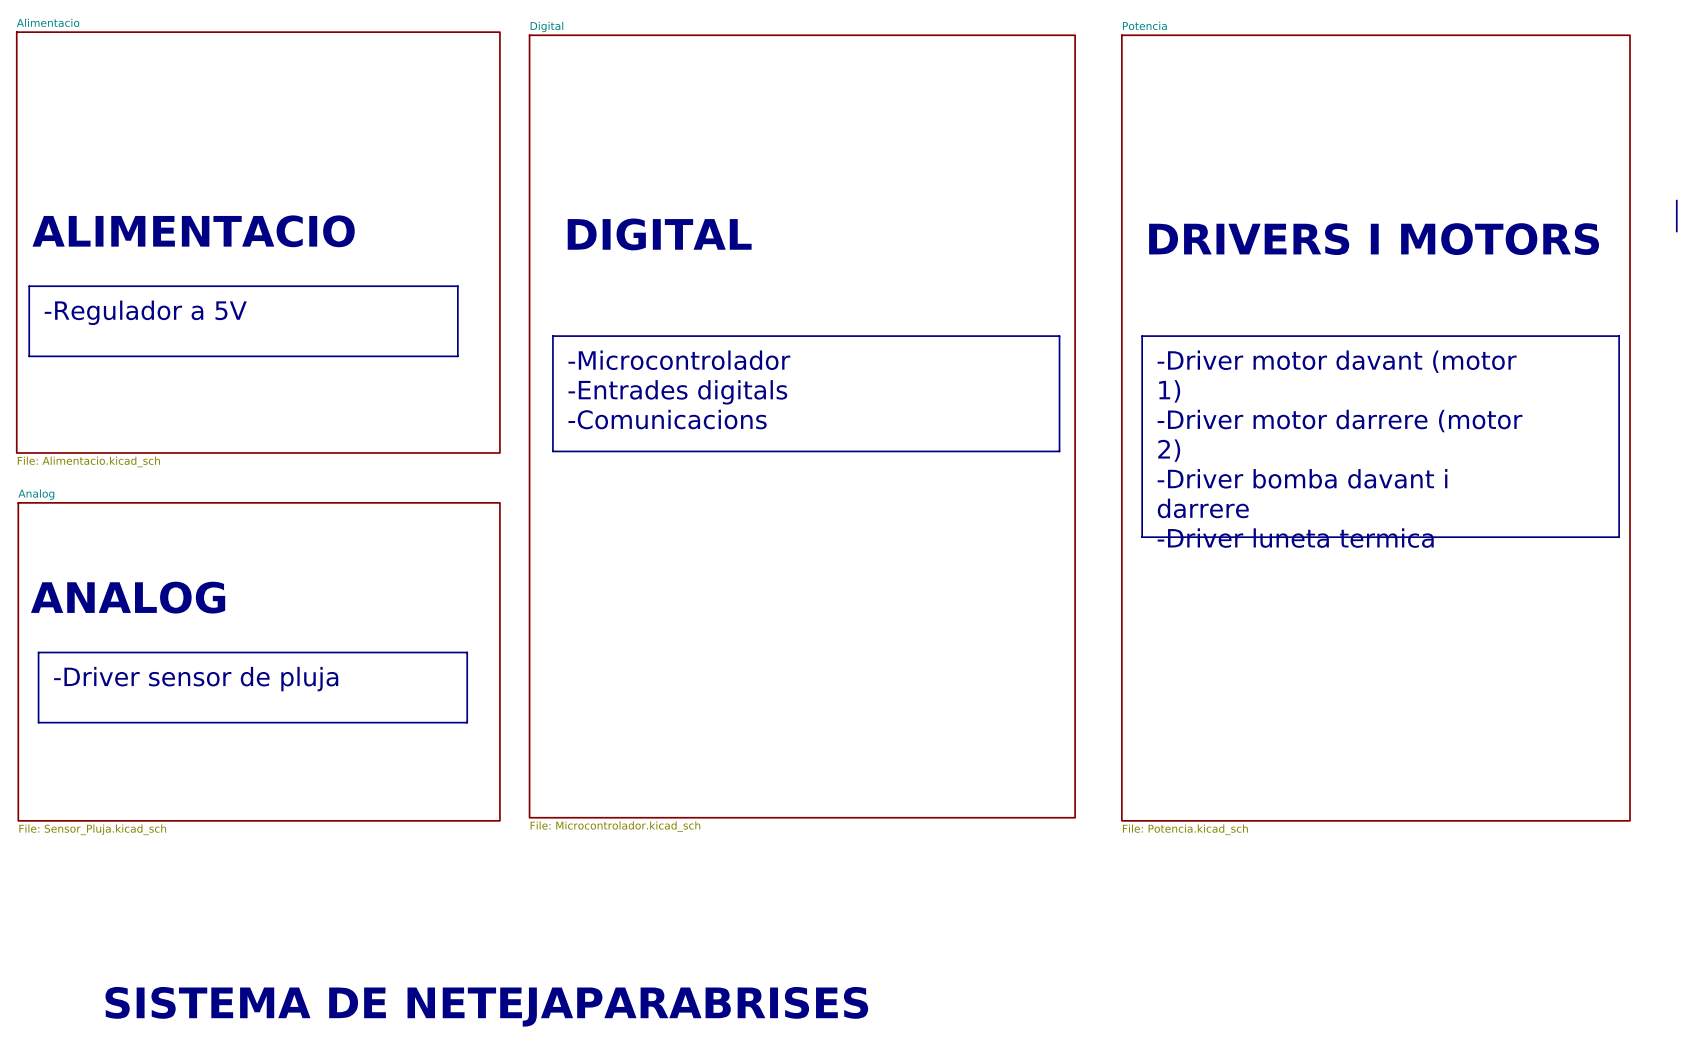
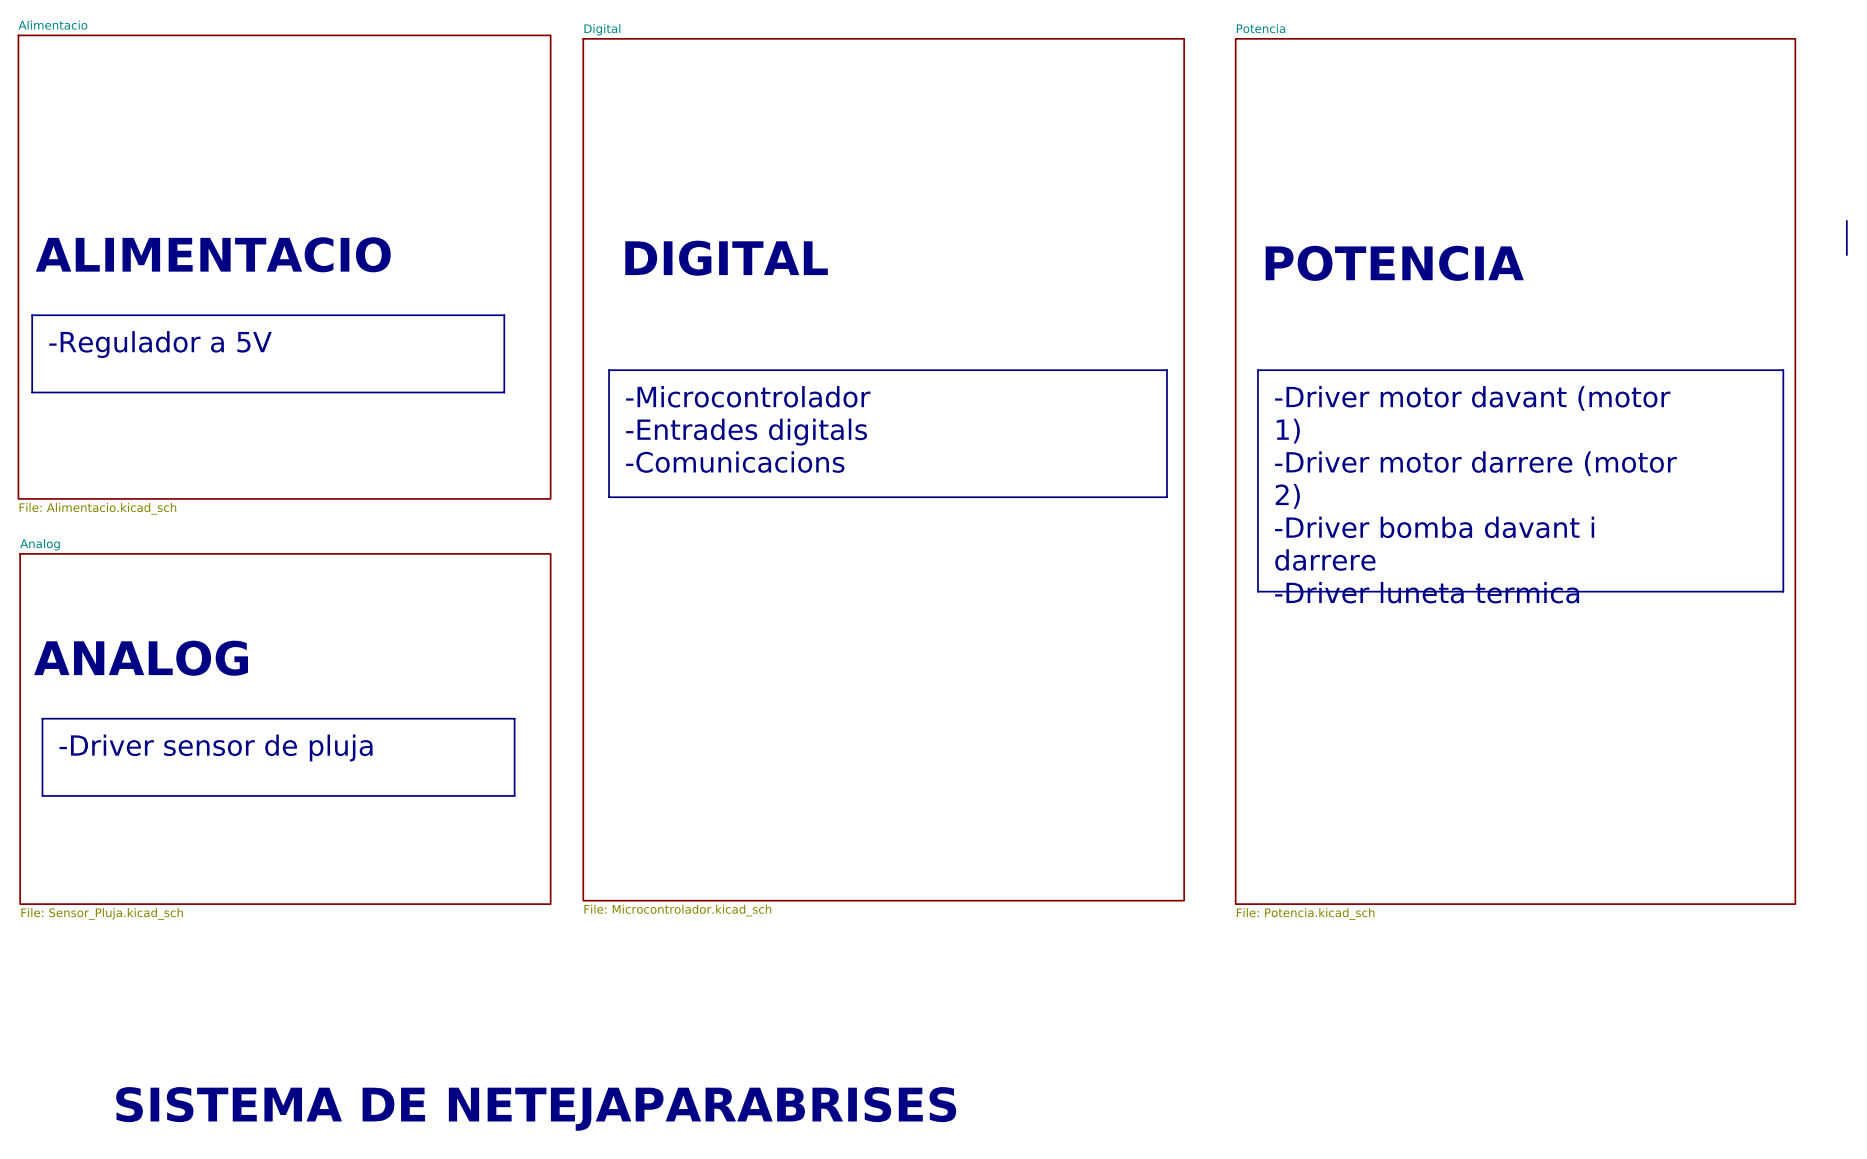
text: DRIVERS I MOTORS (1374, 239) -> POTENCIA (1394, 263)

